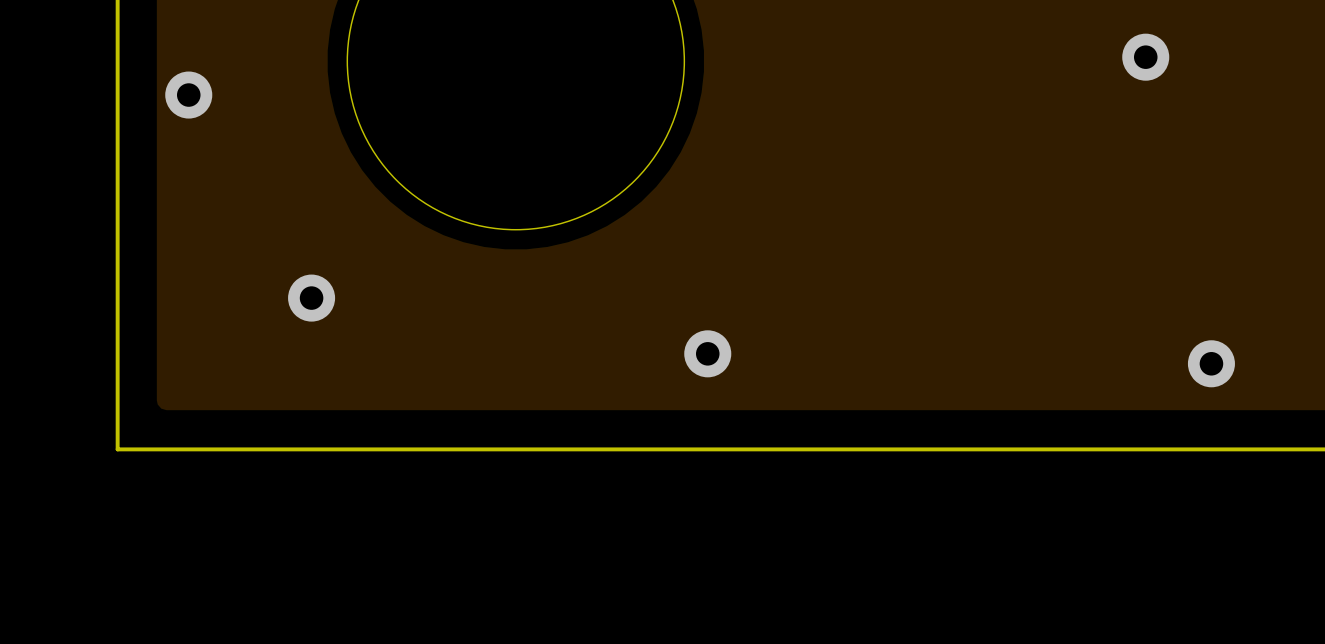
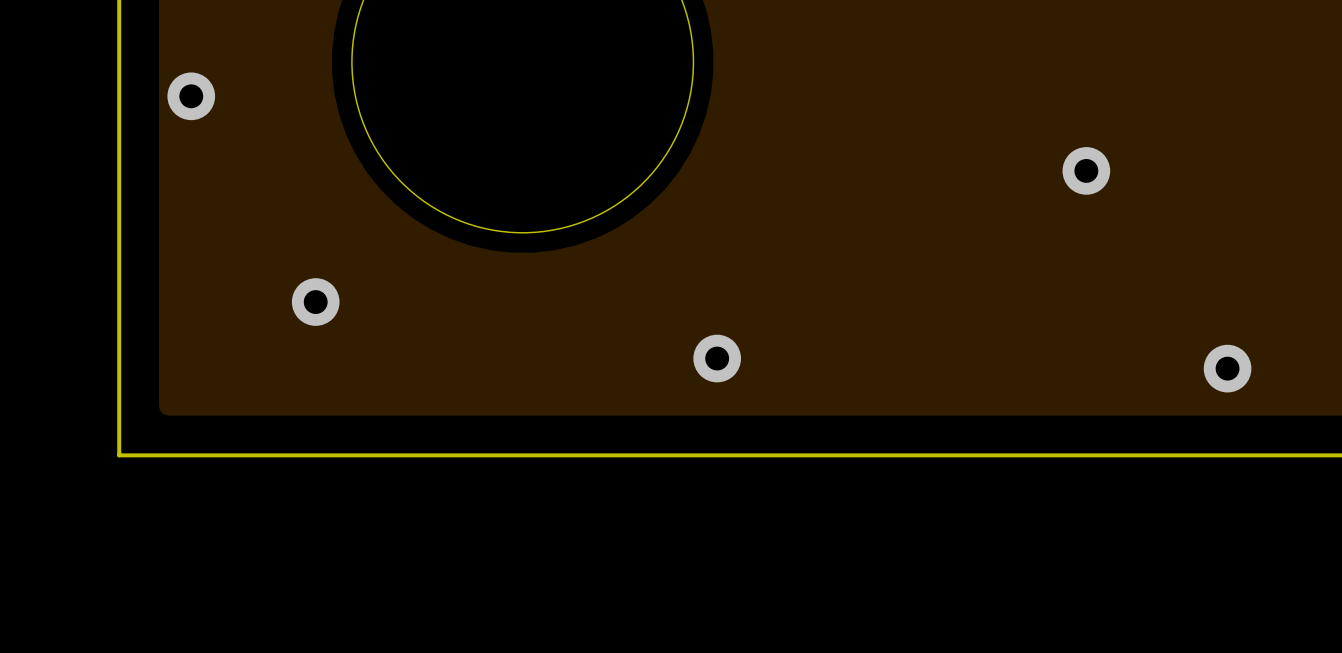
via position: (1145, 57) -> (1086, 170)

